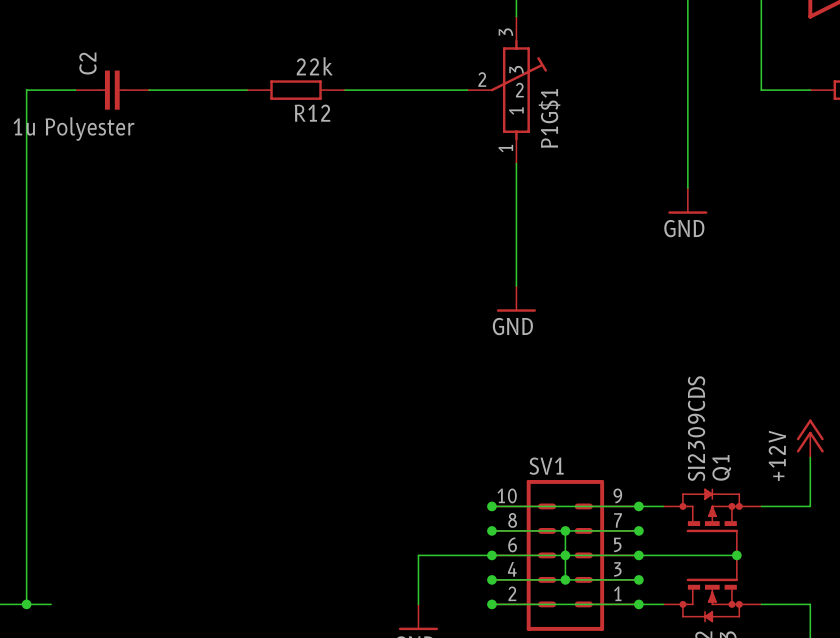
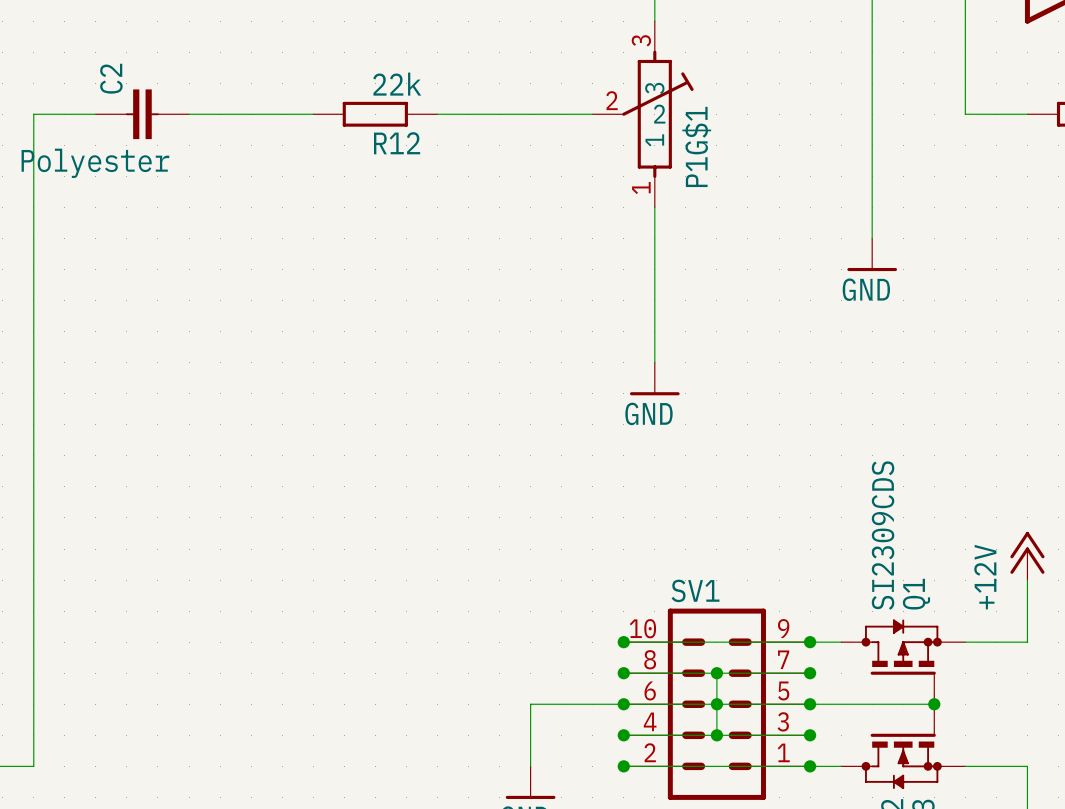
wire: (26, 604) (51, 604) -> none
junction: (26, 604) -> none

